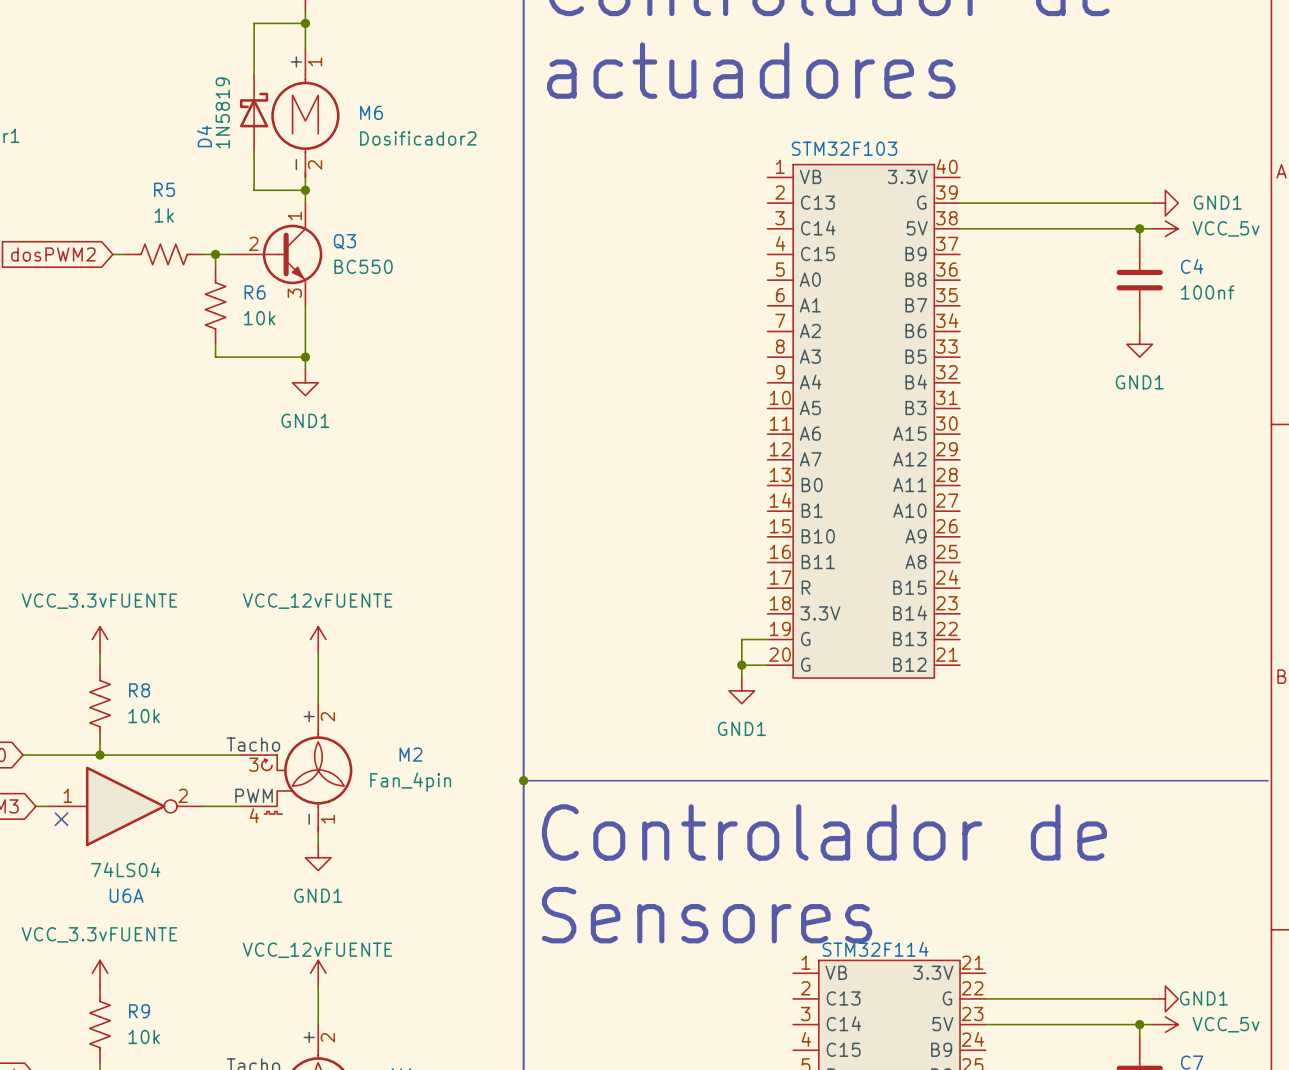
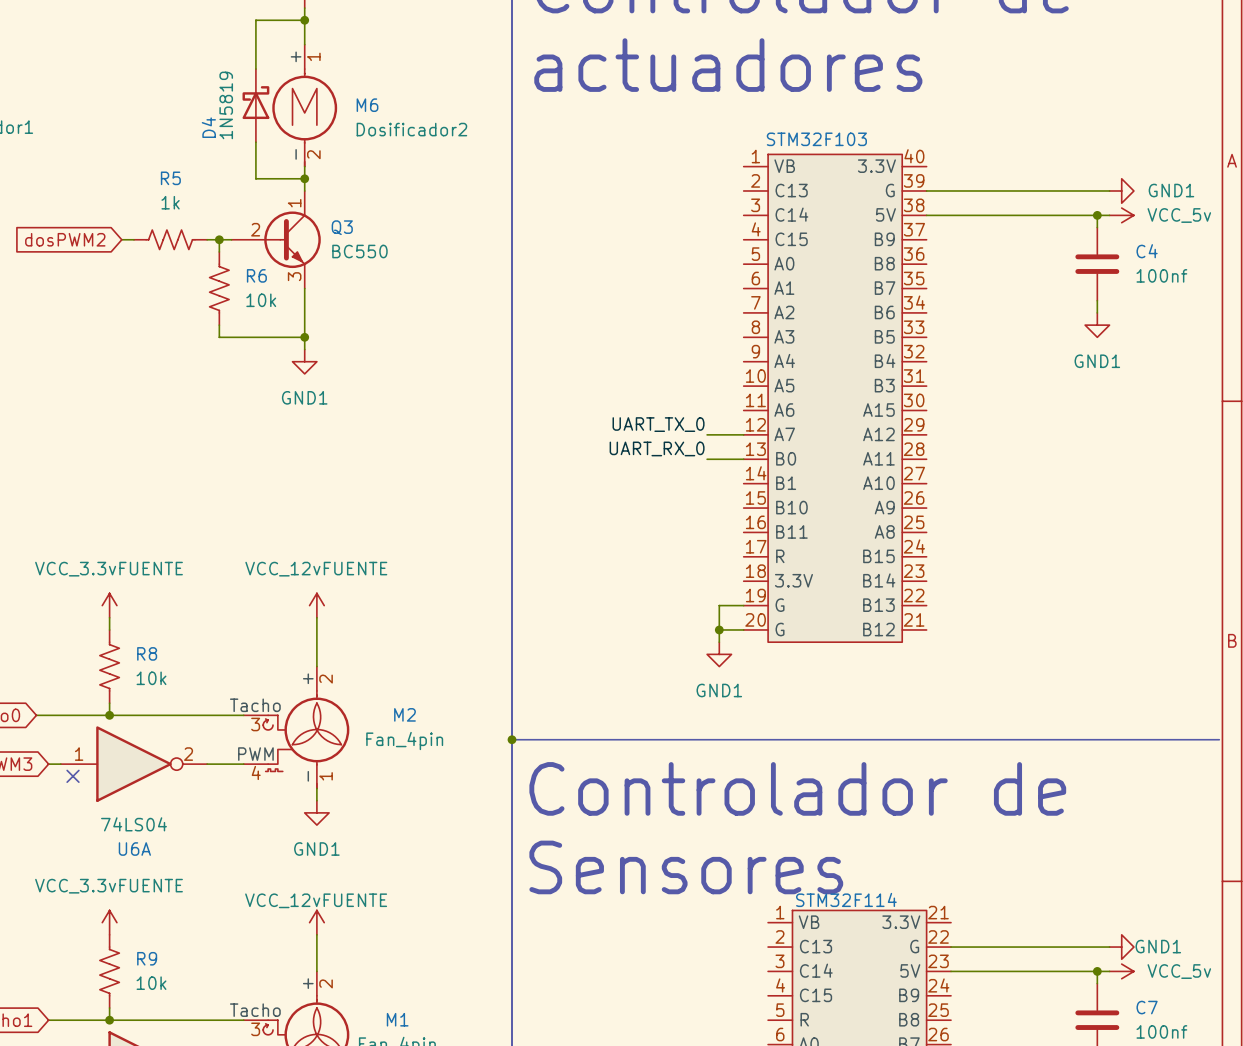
label: none -> UART_TX_0 (658, 424)
wire: none -> (707, 434) (743, 434)
label: none -> UART_RX_0 (657, 448)
wire: none -> (707, 459) (743, 459)

